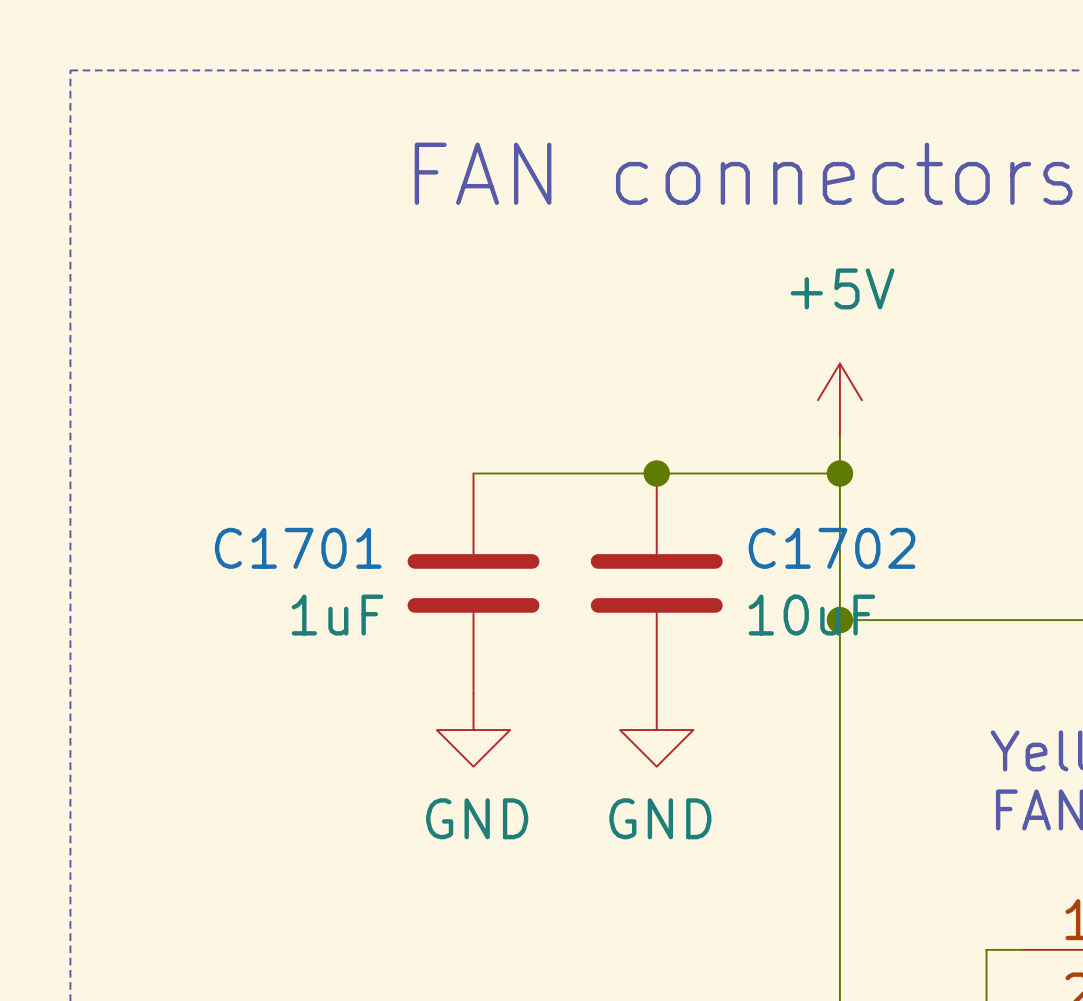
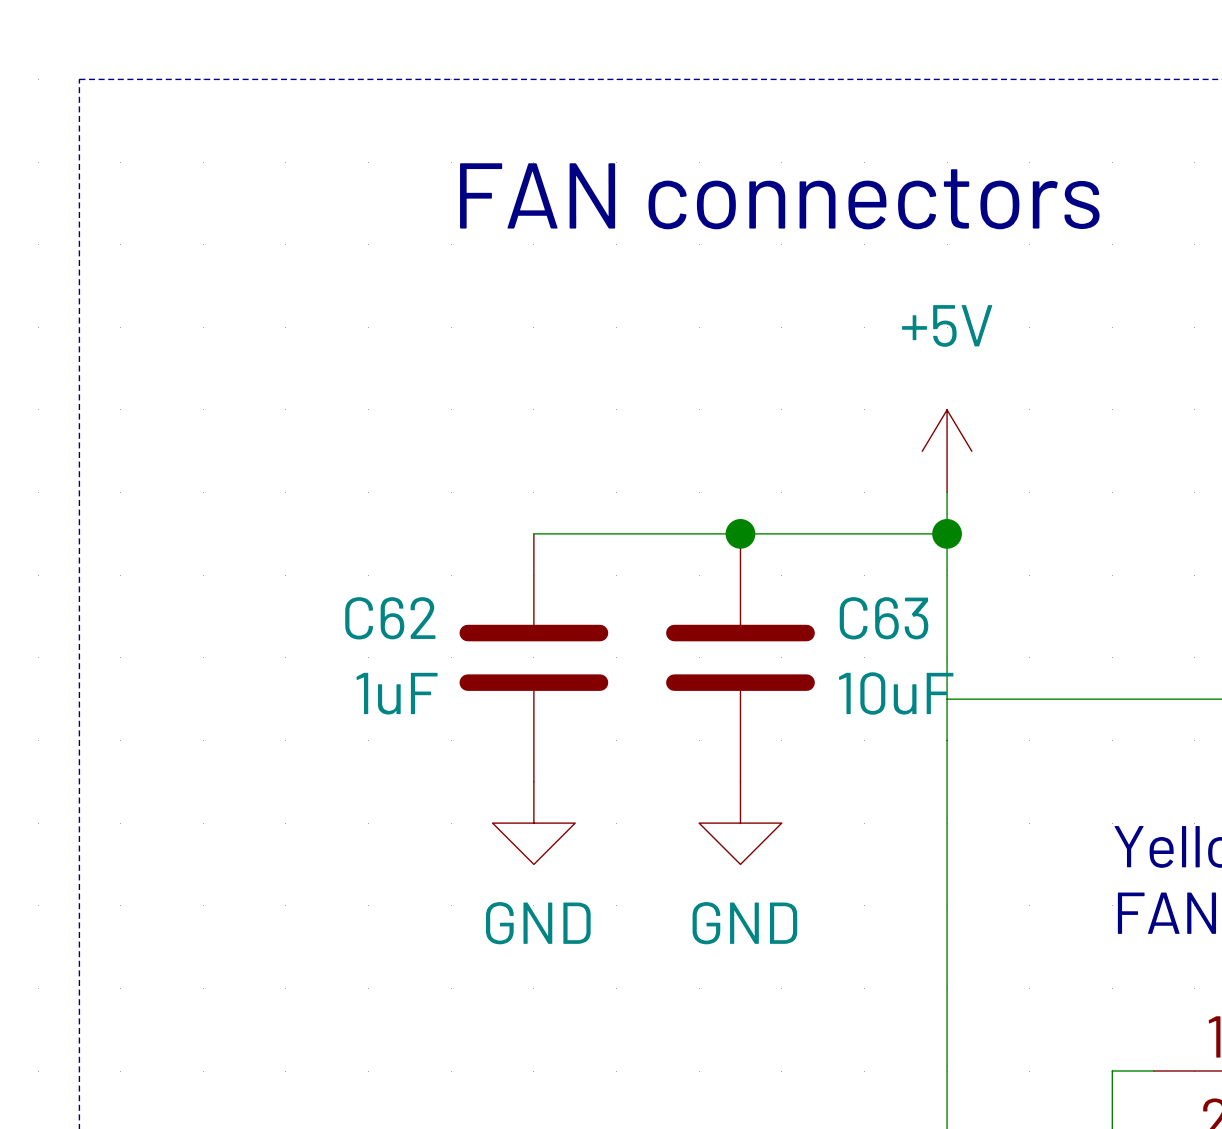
C1701 name: C1701 (298, 548) -> C62 (390, 618)
C1702 name: C1702 (832, 548) -> C63 (884, 618)
junction: (839, 620) -> none

